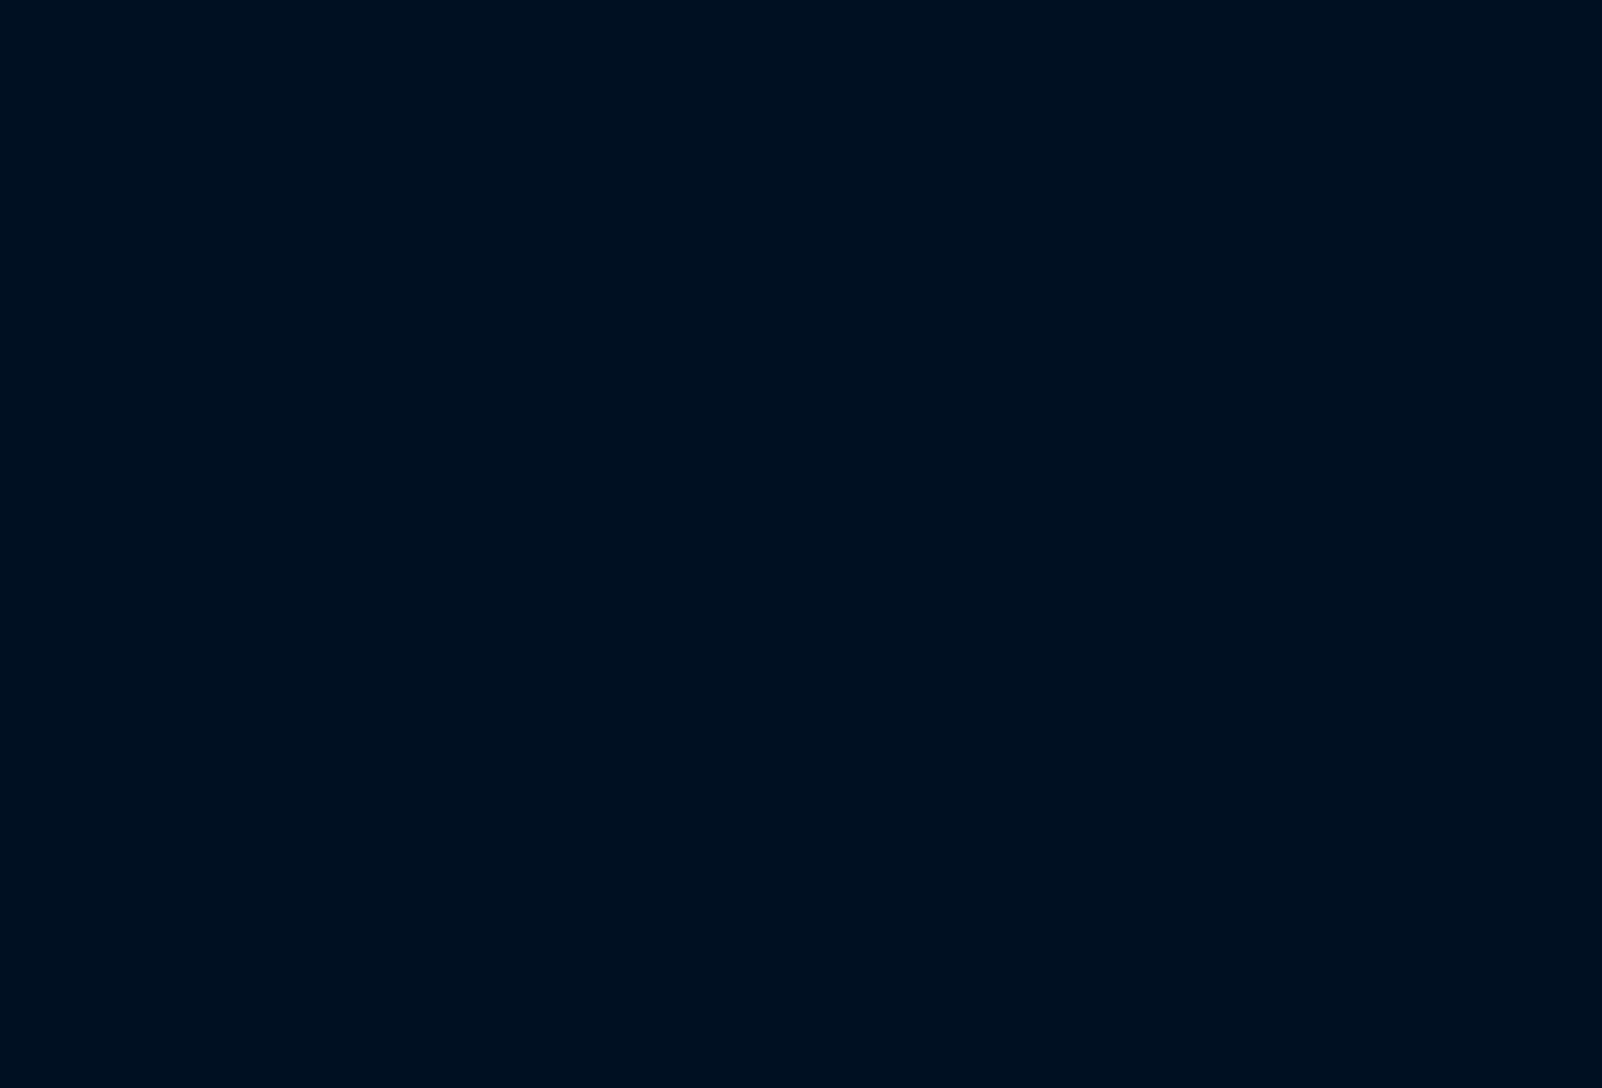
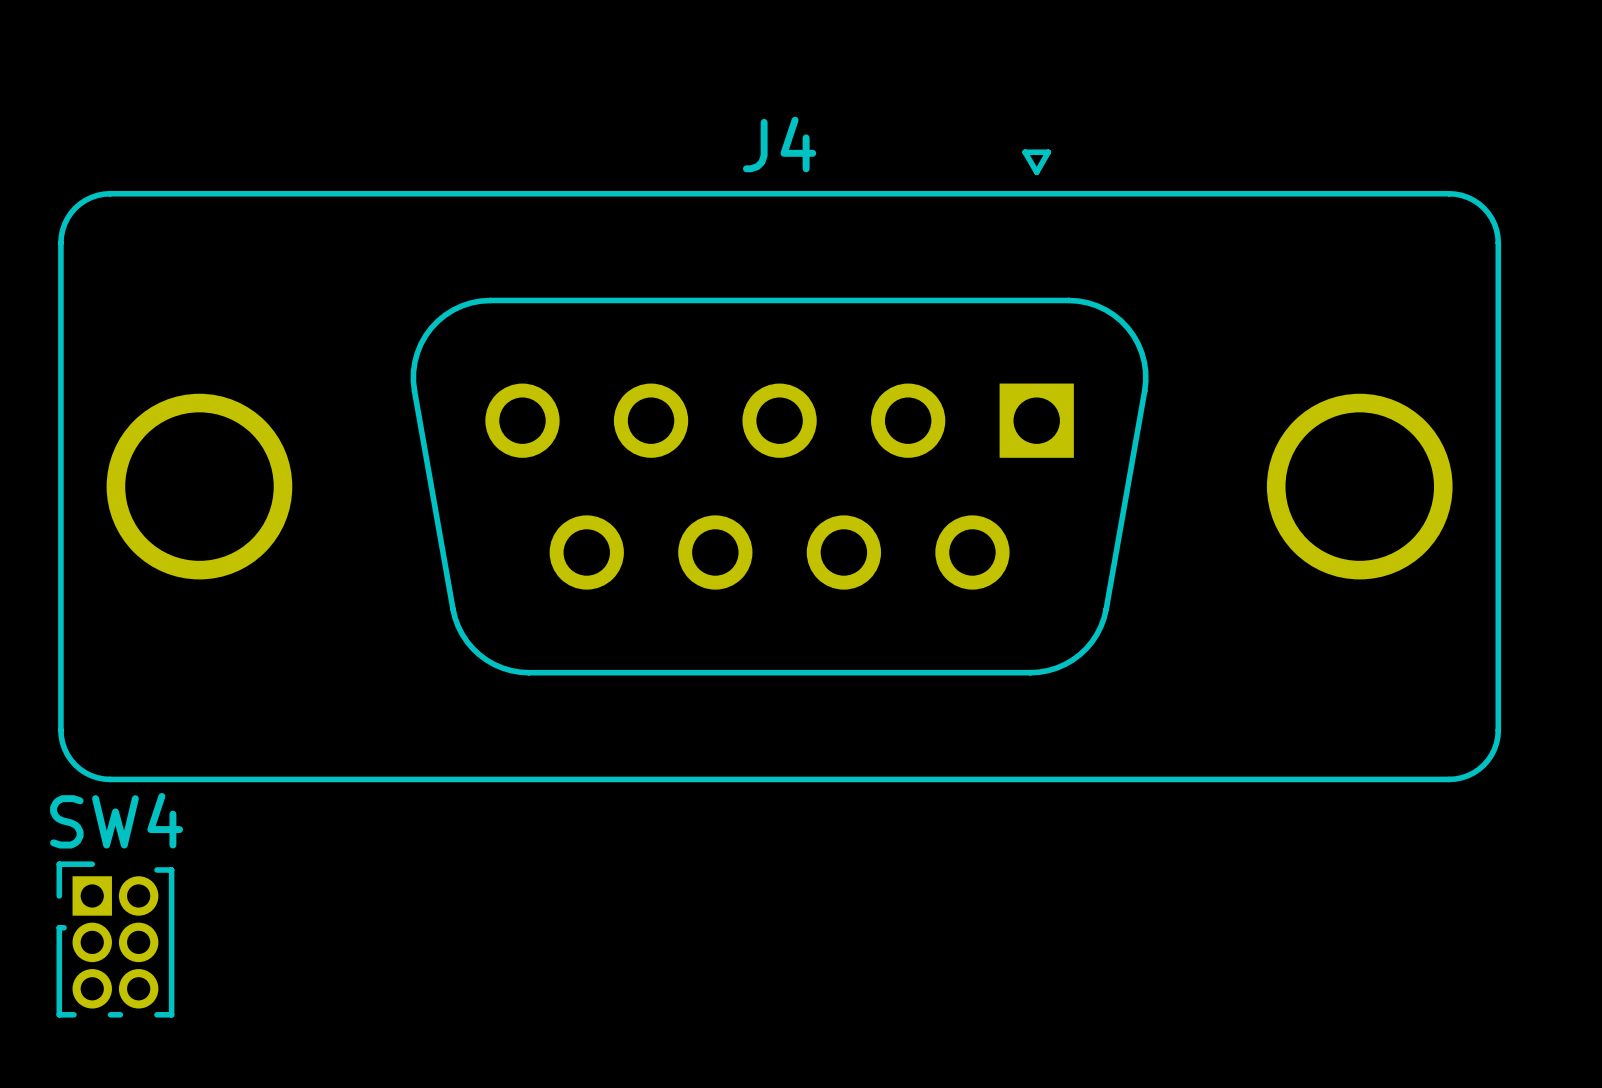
J4: none -> (779, 465)
SW4: none -> (115, 939)

